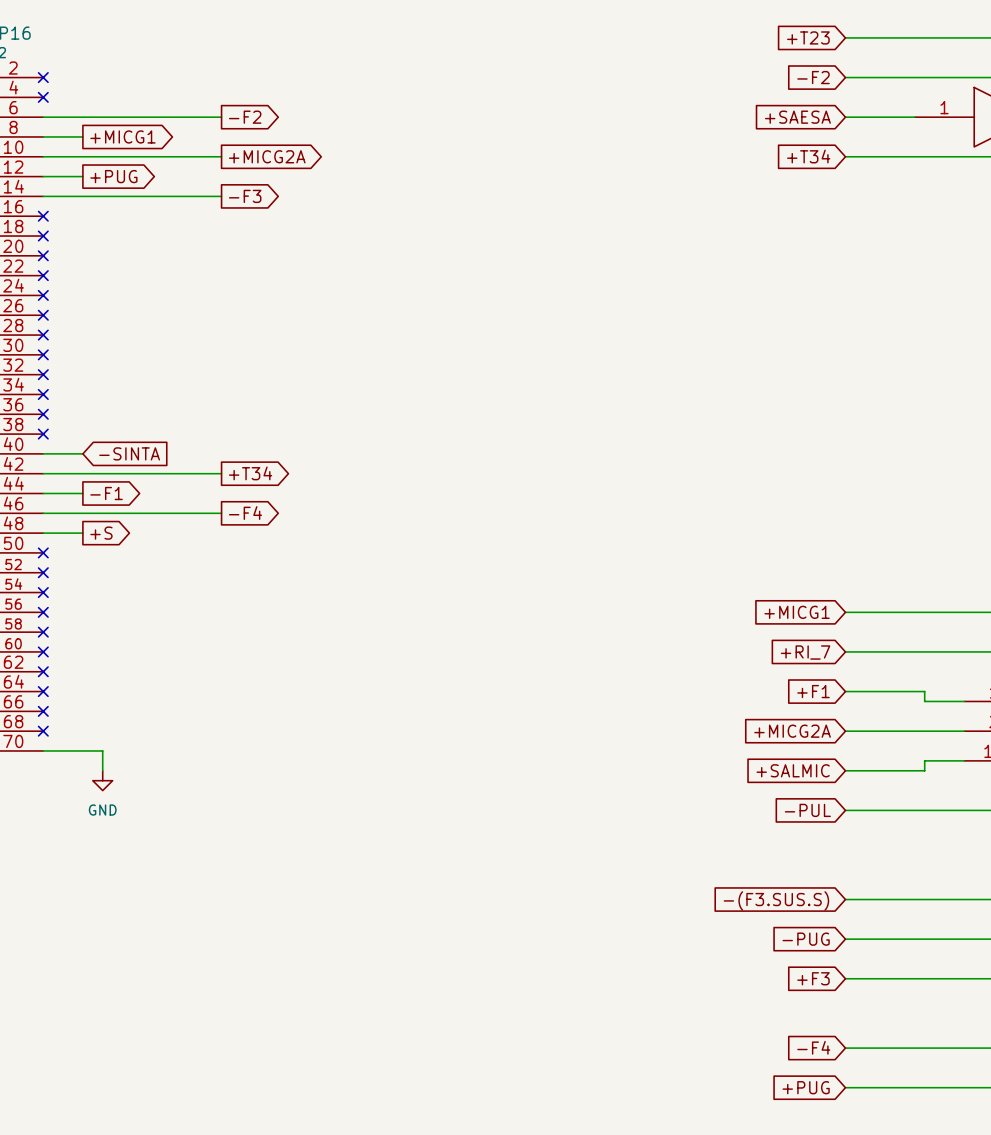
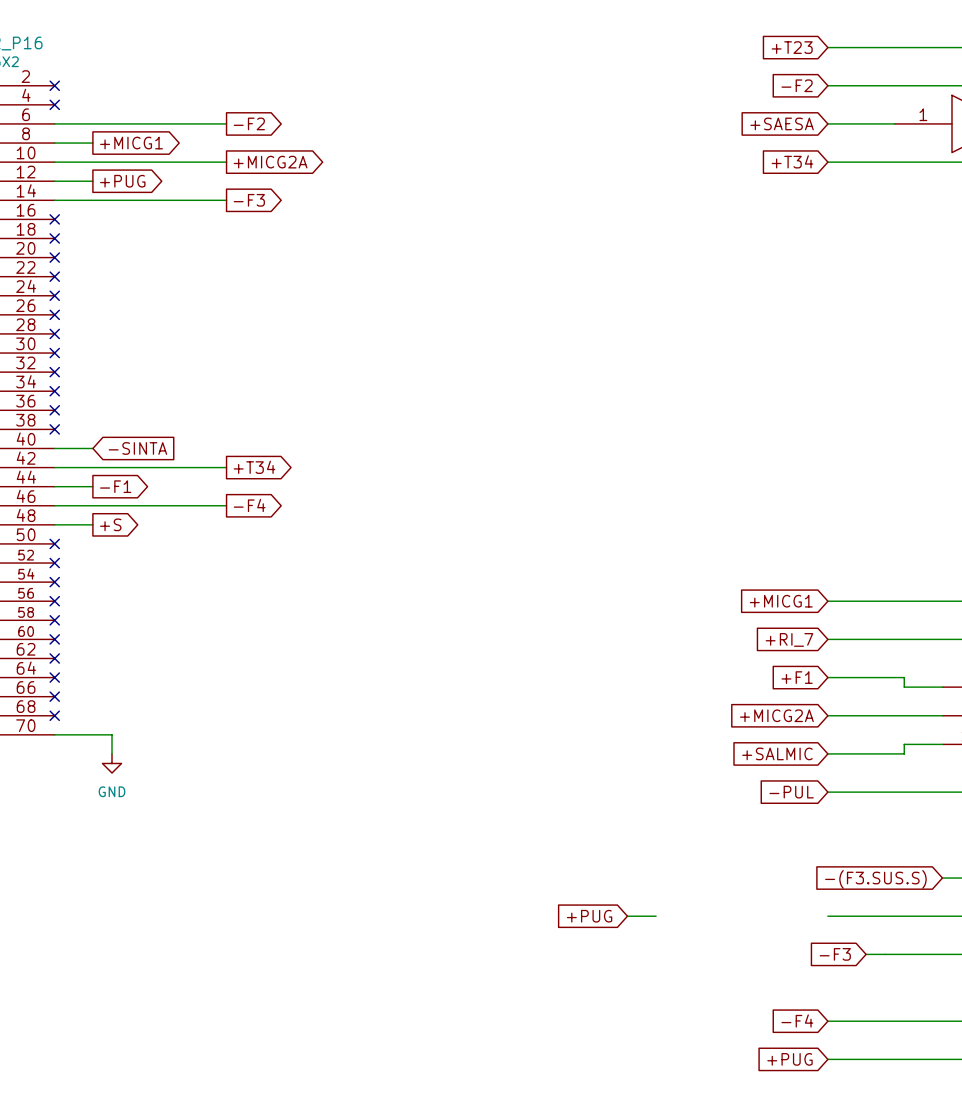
wire: (845, 899) (964, 899) -> none
global label position: -(F3.SUS.S) (776, 900) -> -(F3.SUS.S) (875, 879)
global label: none -> +PUG (589, 916)
wire: none -> (627, 916) (656, 916)
global label: -PUG (806, 939) -> none
global label: +F3 (813, 978) -> -F3 (835, 954)
wire: (845, 978) (885, 978) -> none

